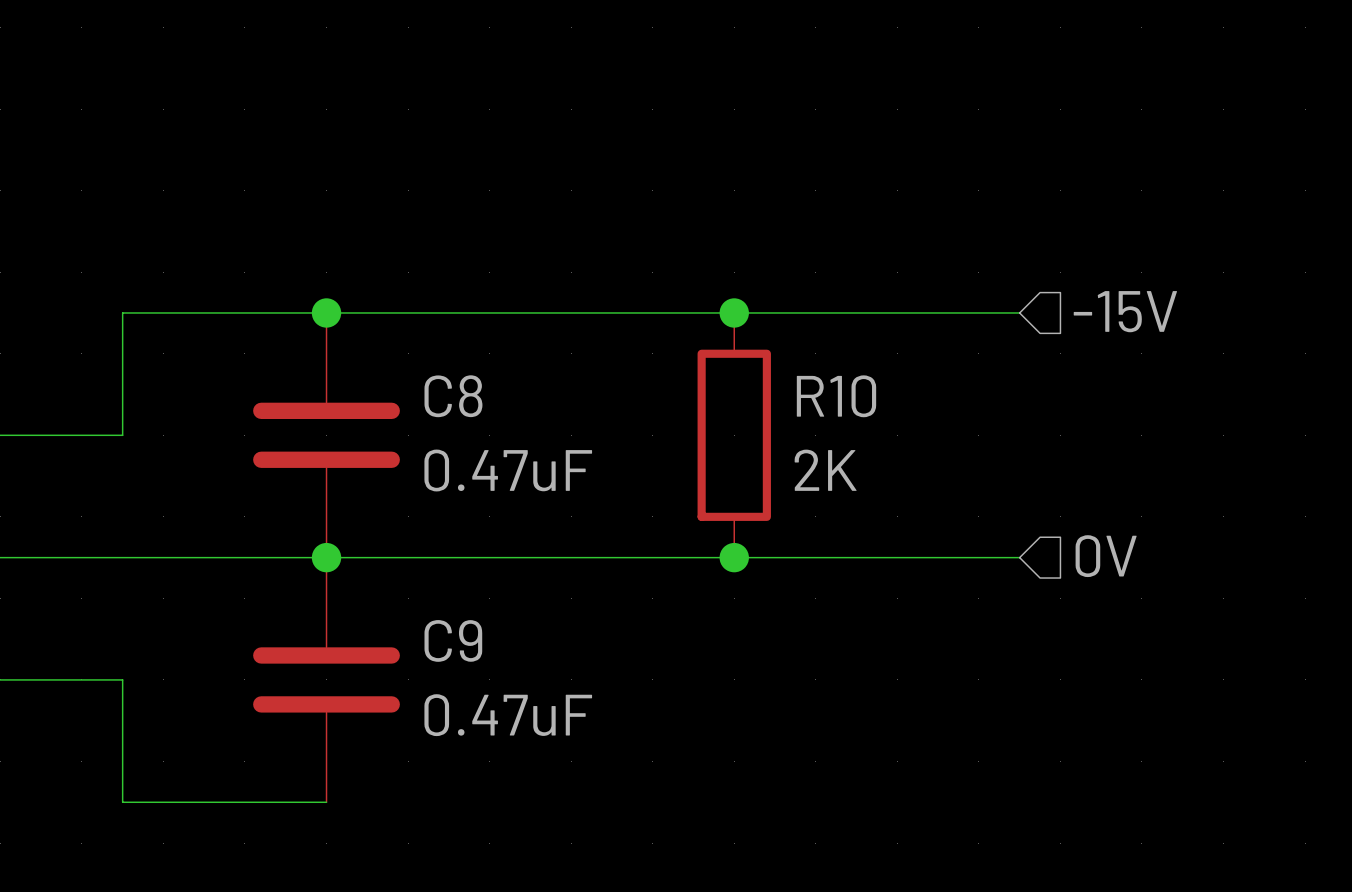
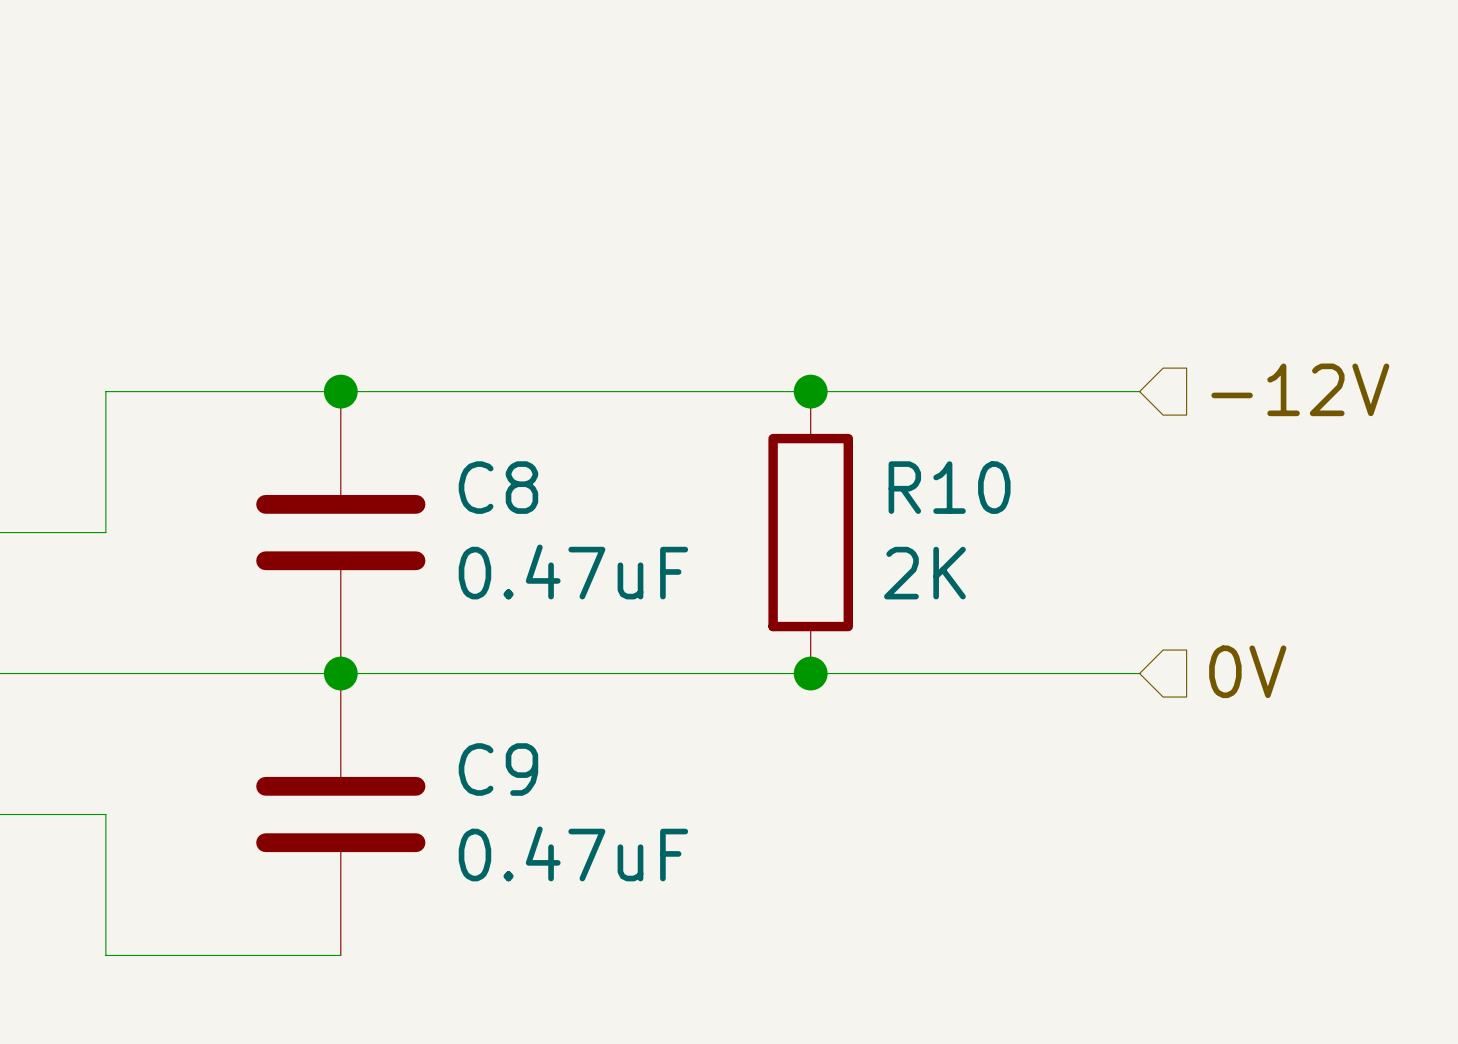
hierarchical label: -15V (1125, 311) -> -12V (1300, 389)

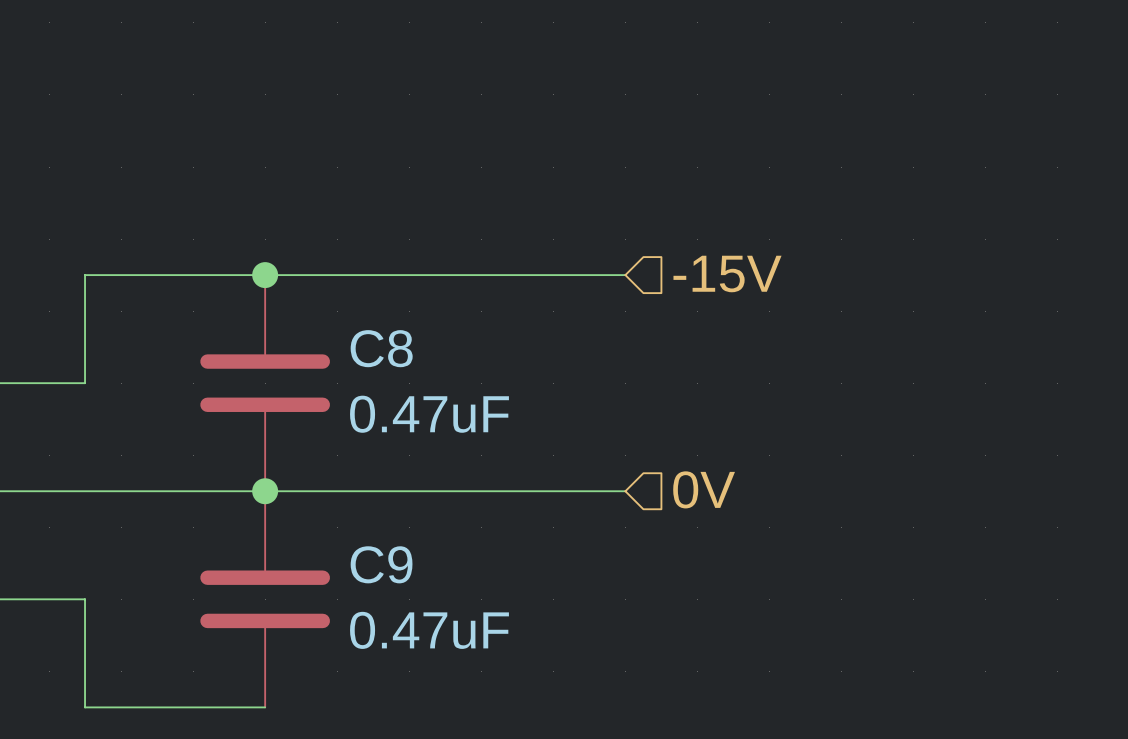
hierarchical label: none -> -15V (727, 274)
hierarchical label: -12V (1300, 389) -> none
wire: (810, 391) (1139, 391) -> none
junction: (810, 391) -> none
R10: 2K (810, 532) -> none
hierarchical label position: 0V (1247, 671) -> 0V (704, 489)
wire: (810, 673) (1139, 673) -> none
junction: (810, 673) -> none

